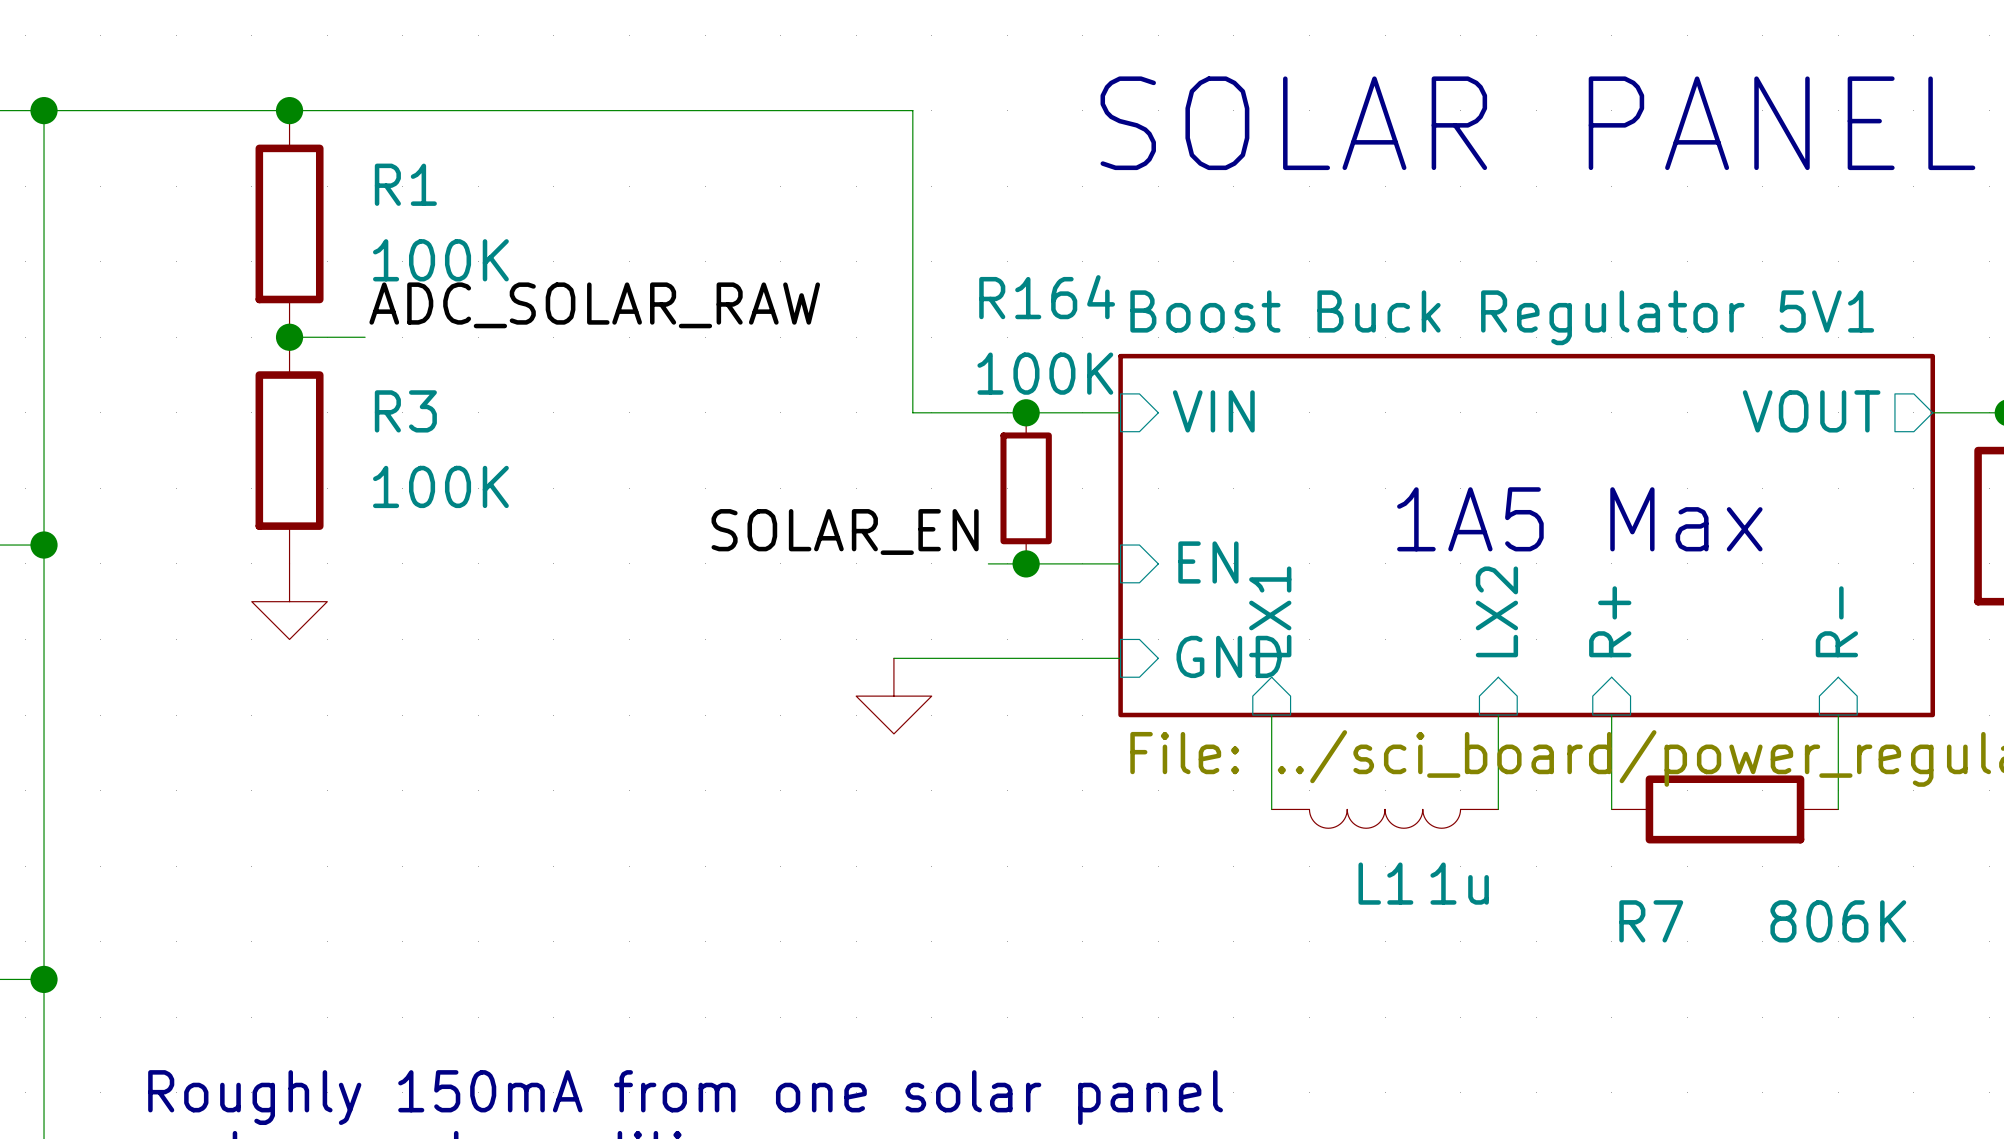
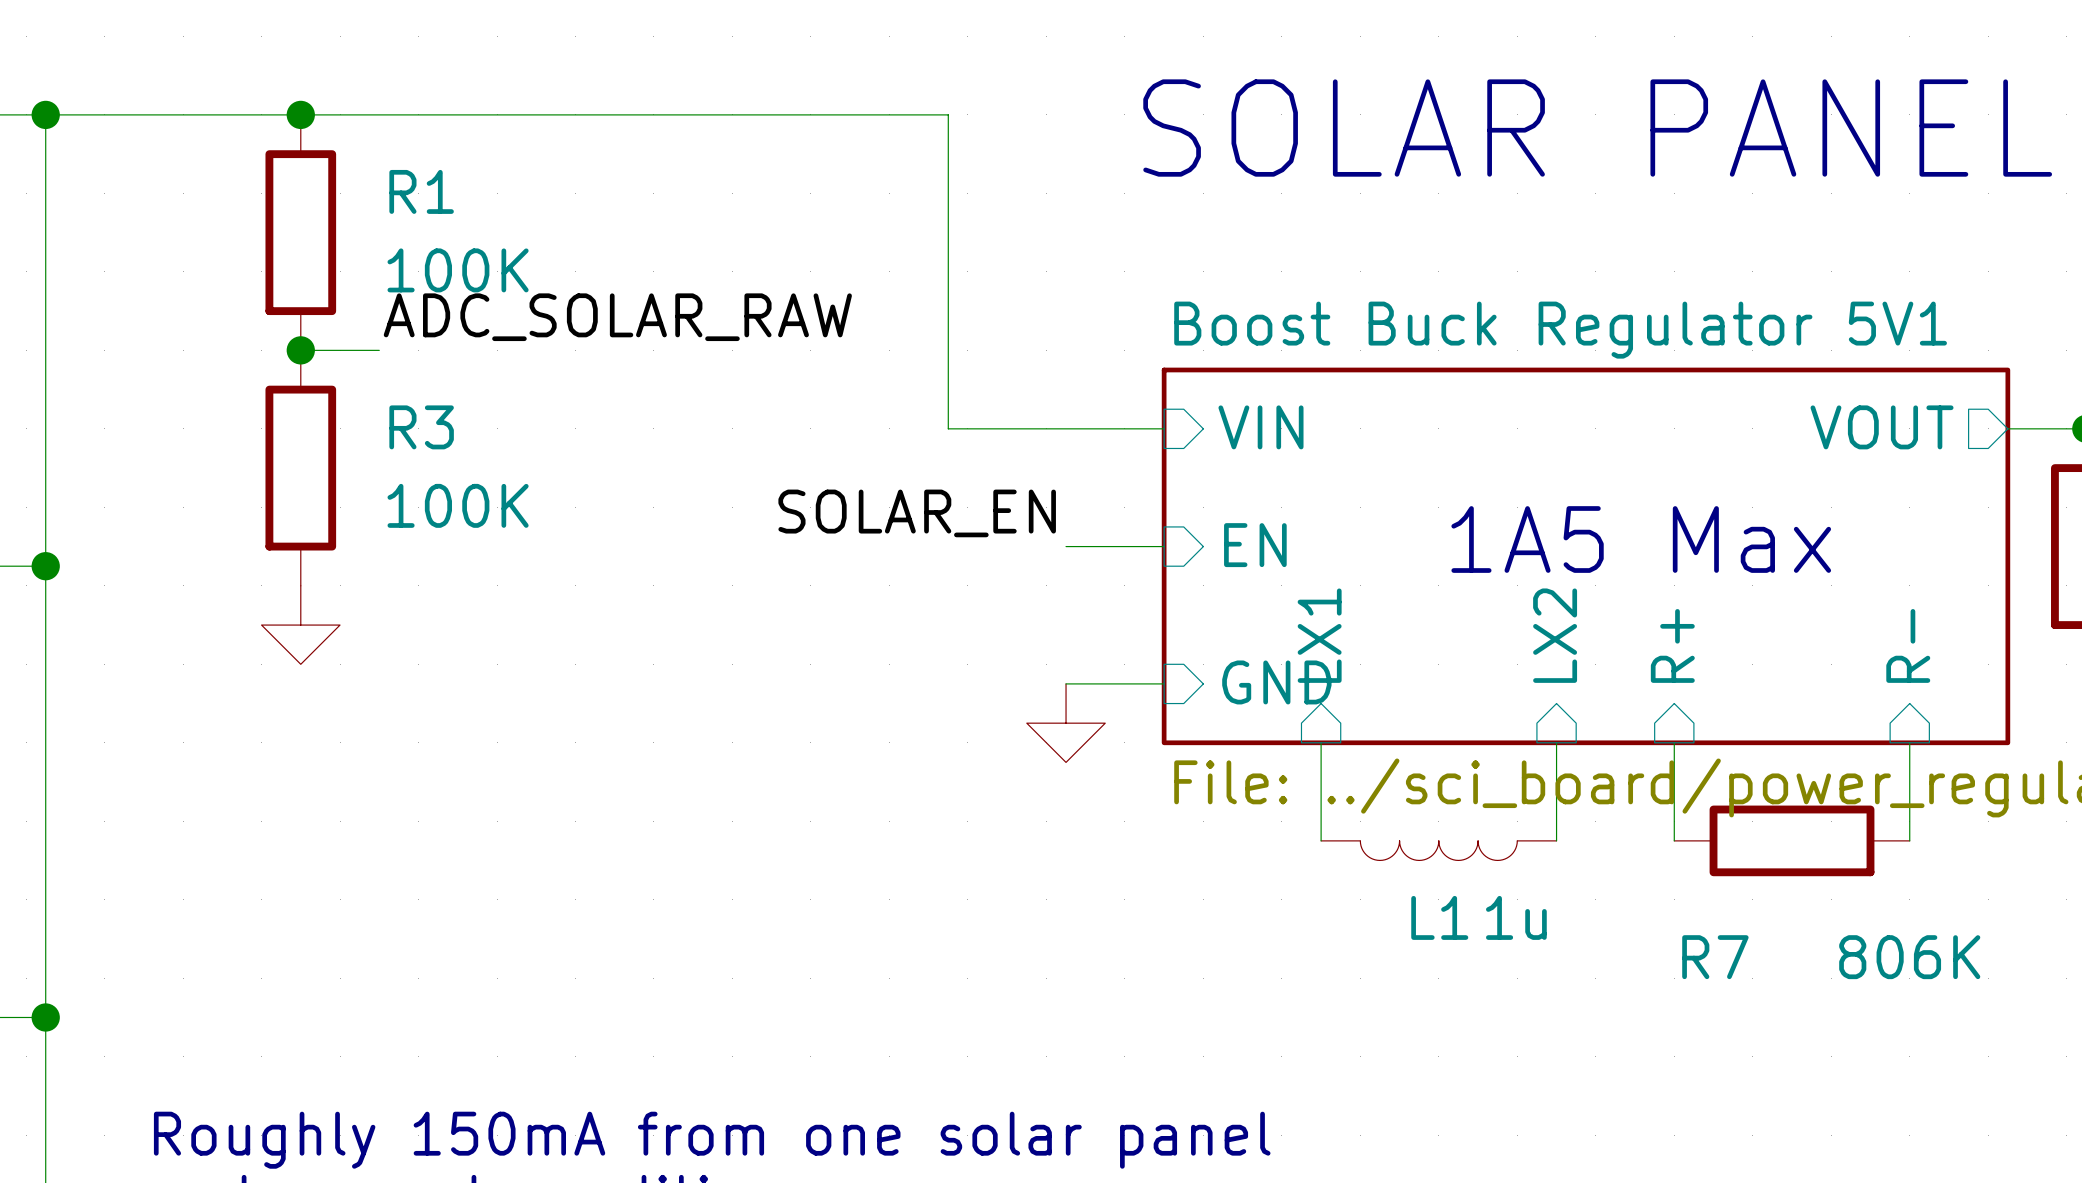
junction: (1026, 412) -> none
R164: 100K (1026, 488) -> none
wire: none -> (1066, 546) (1164, 546)
label position: SOLAR_EN (845, 531) -> SOLAR_EN (917, 513)
sheet pin position: EN (1208, 562) -> EN (1255, 545)
wire: (988, 563) (1120, 563) -> none
junction: (1026, 563) -> none
wire: (893, 658) (1026, 658) -> none
power symbol position: (893, 696) -> (1066, 723)

